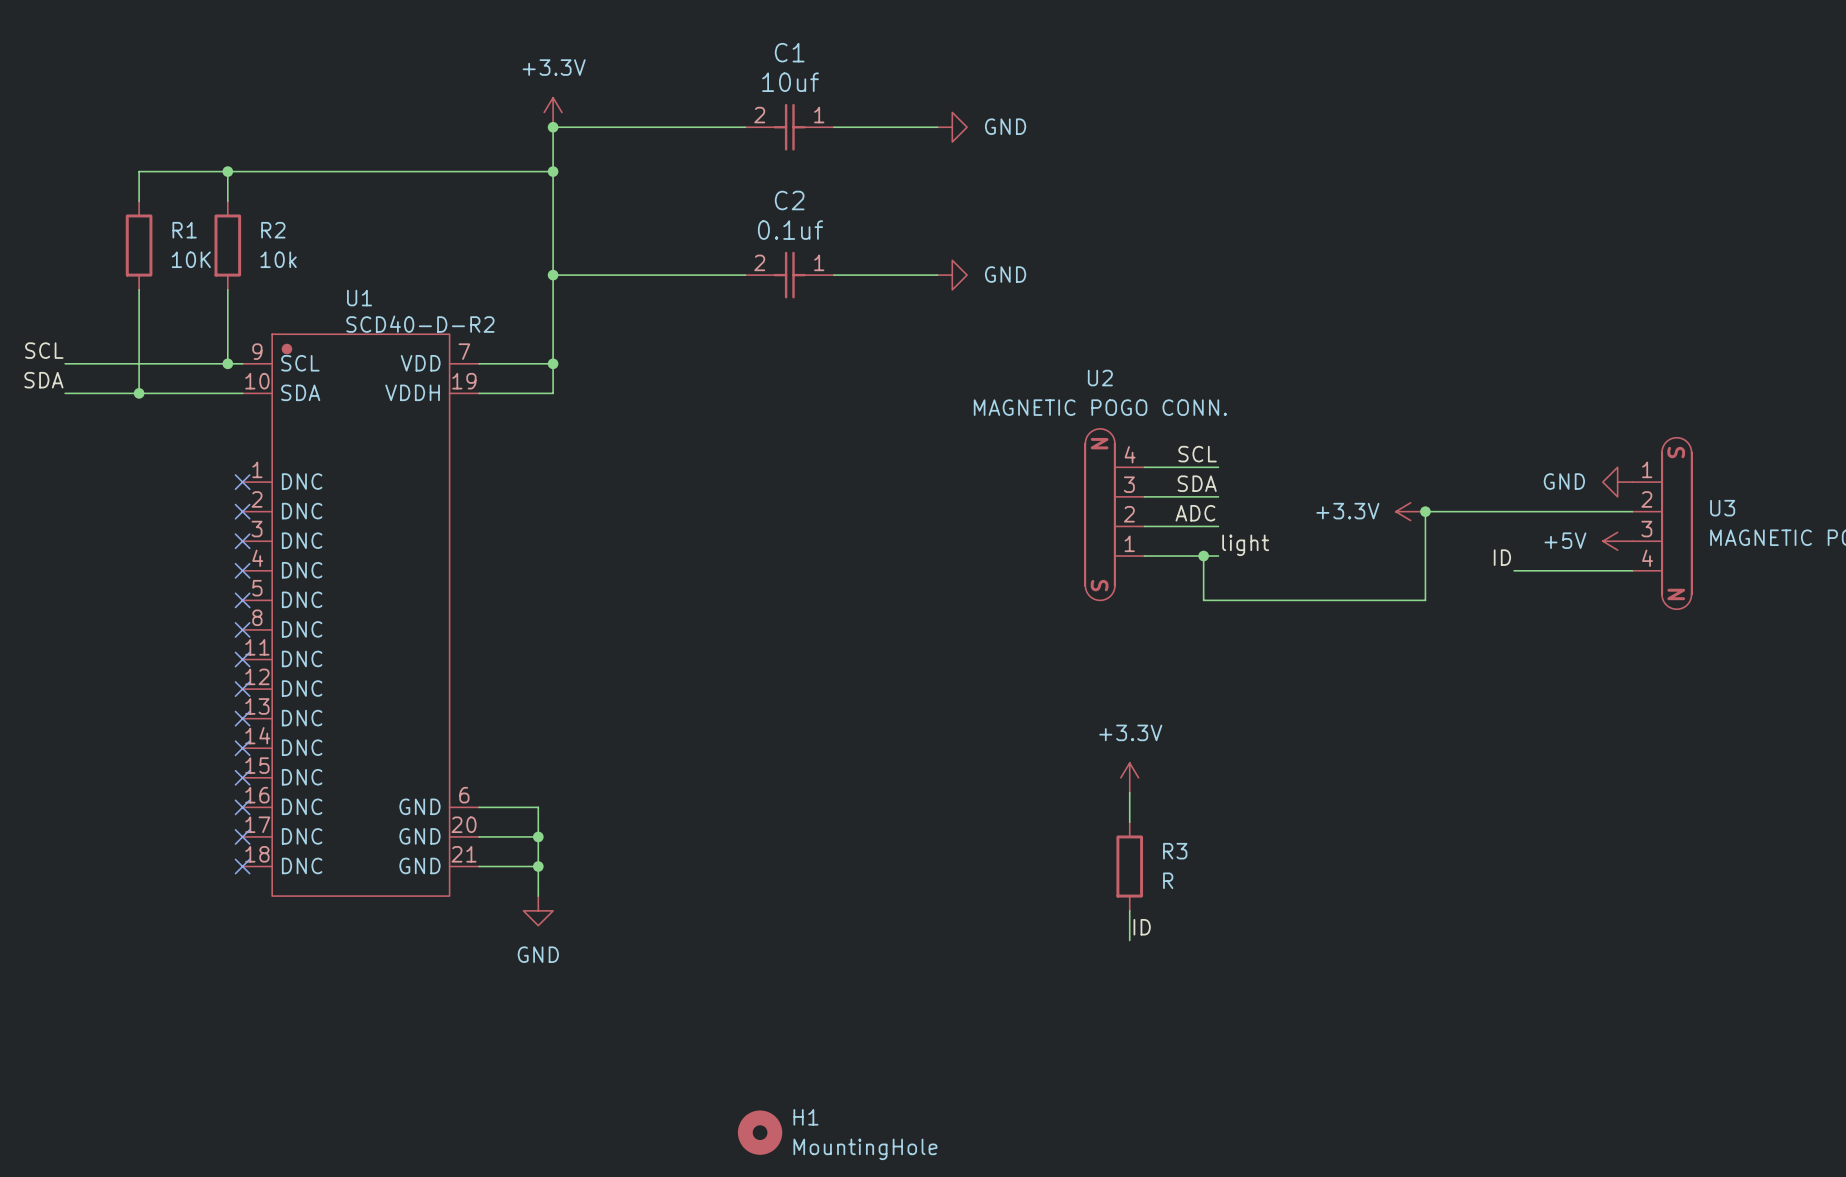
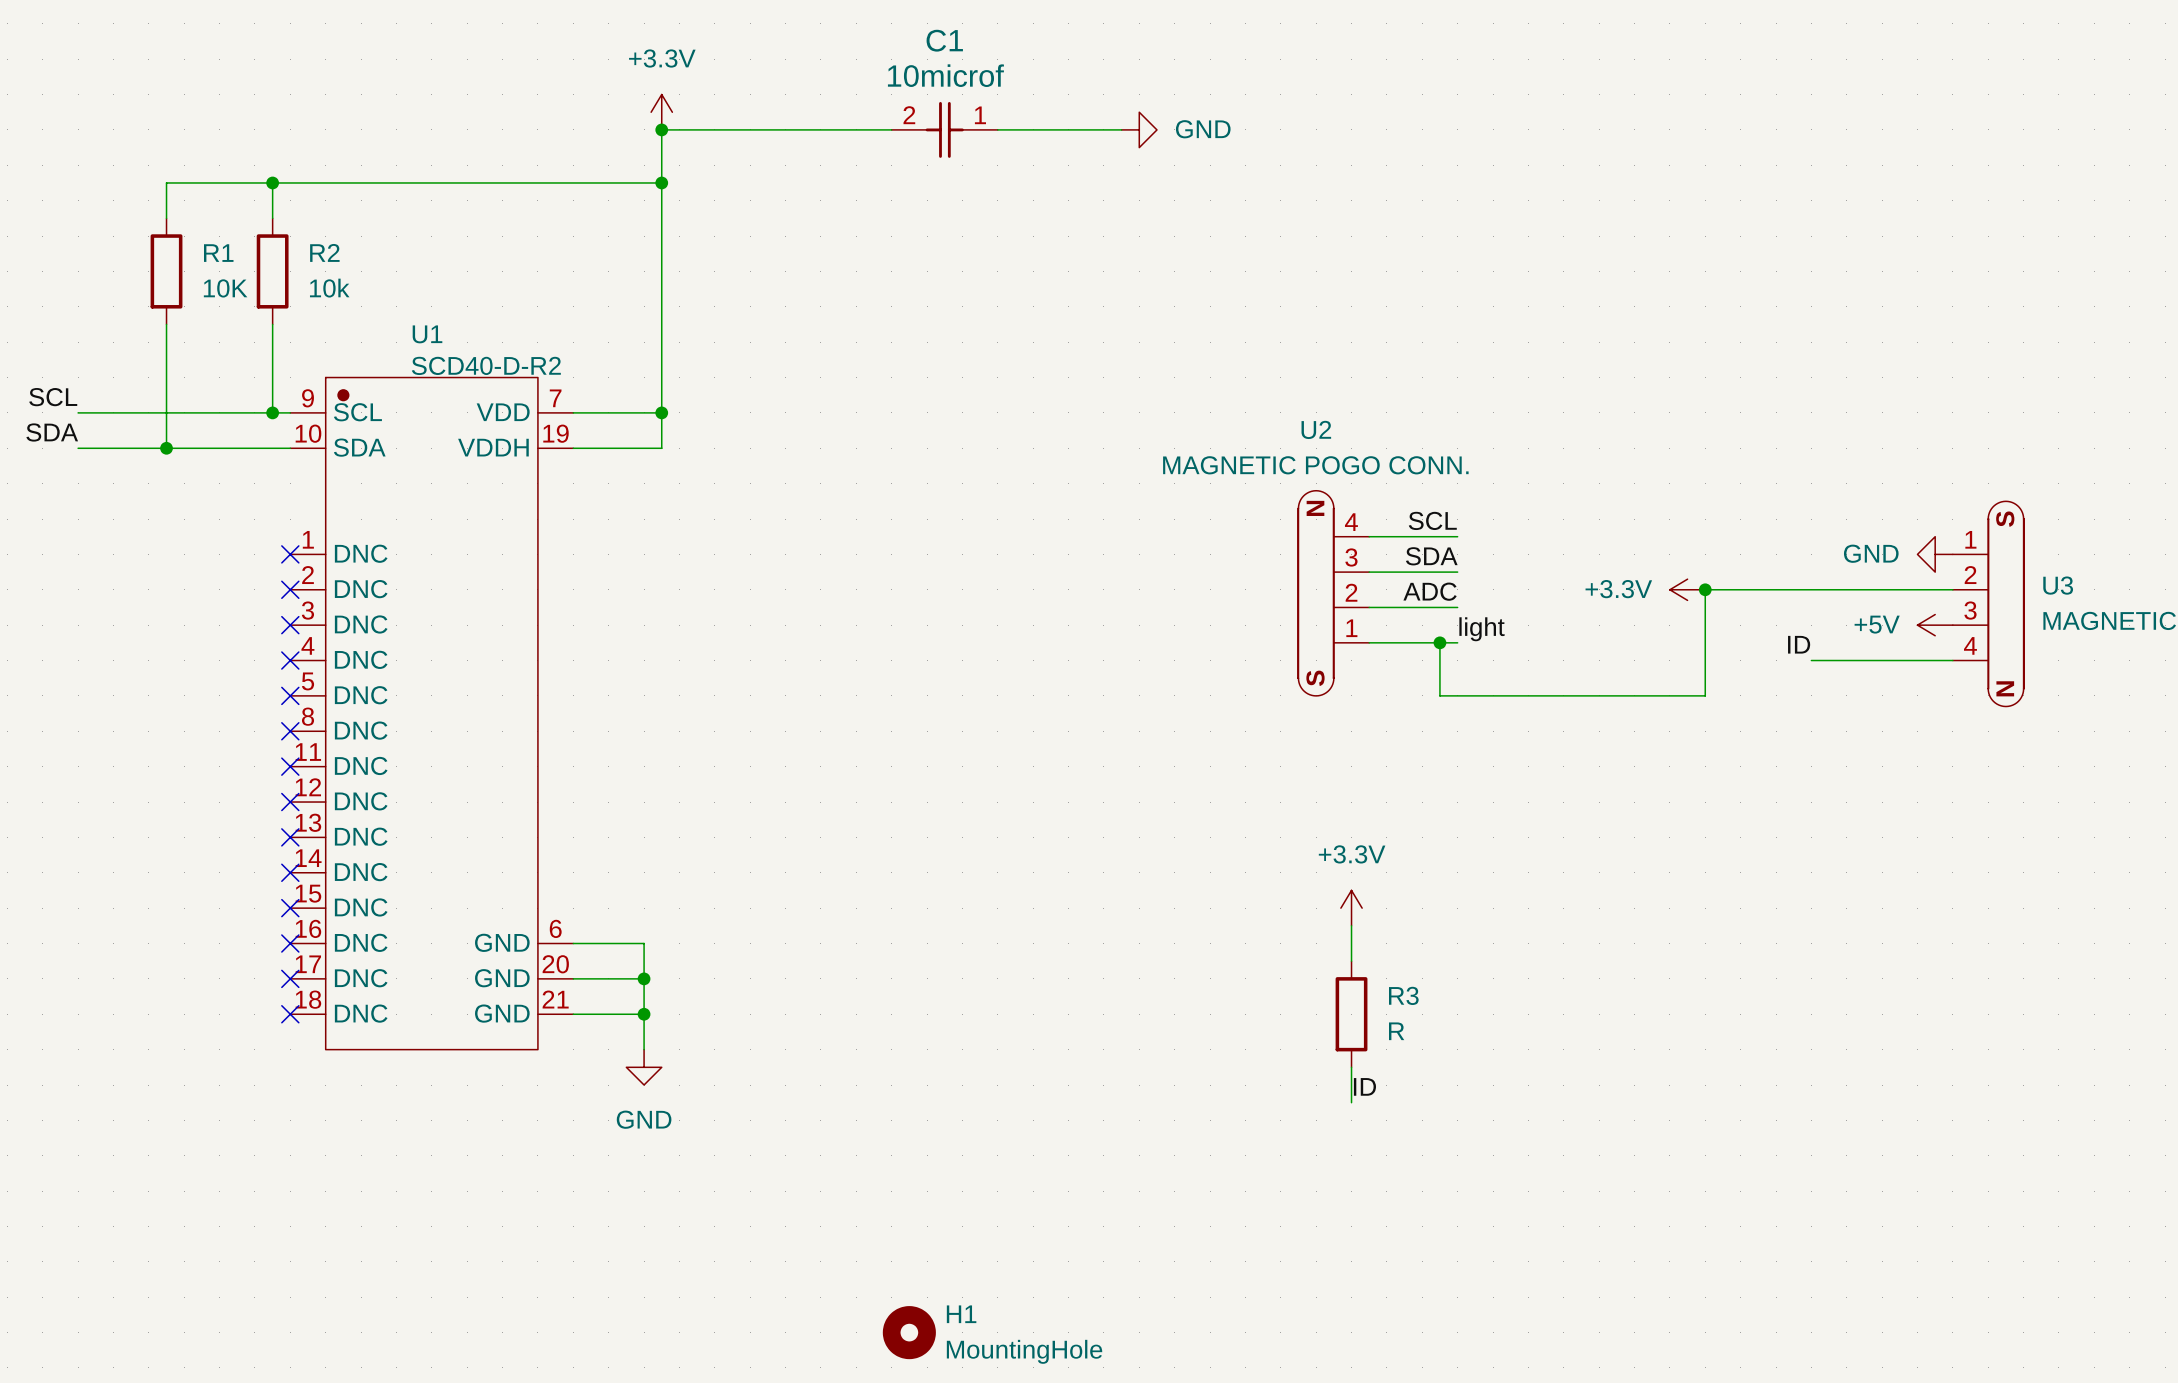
C1 value: 10uf (790, 82) -> 10microf (945, 75)
wire: (553, 275) (745, 275) -> none
junction: (553, 275) -> none
C2: 0.1uf (789, 275) -> none
wire: (834, 275) (937, 275) -> none
power symbol: GND (952, 275) -> none

